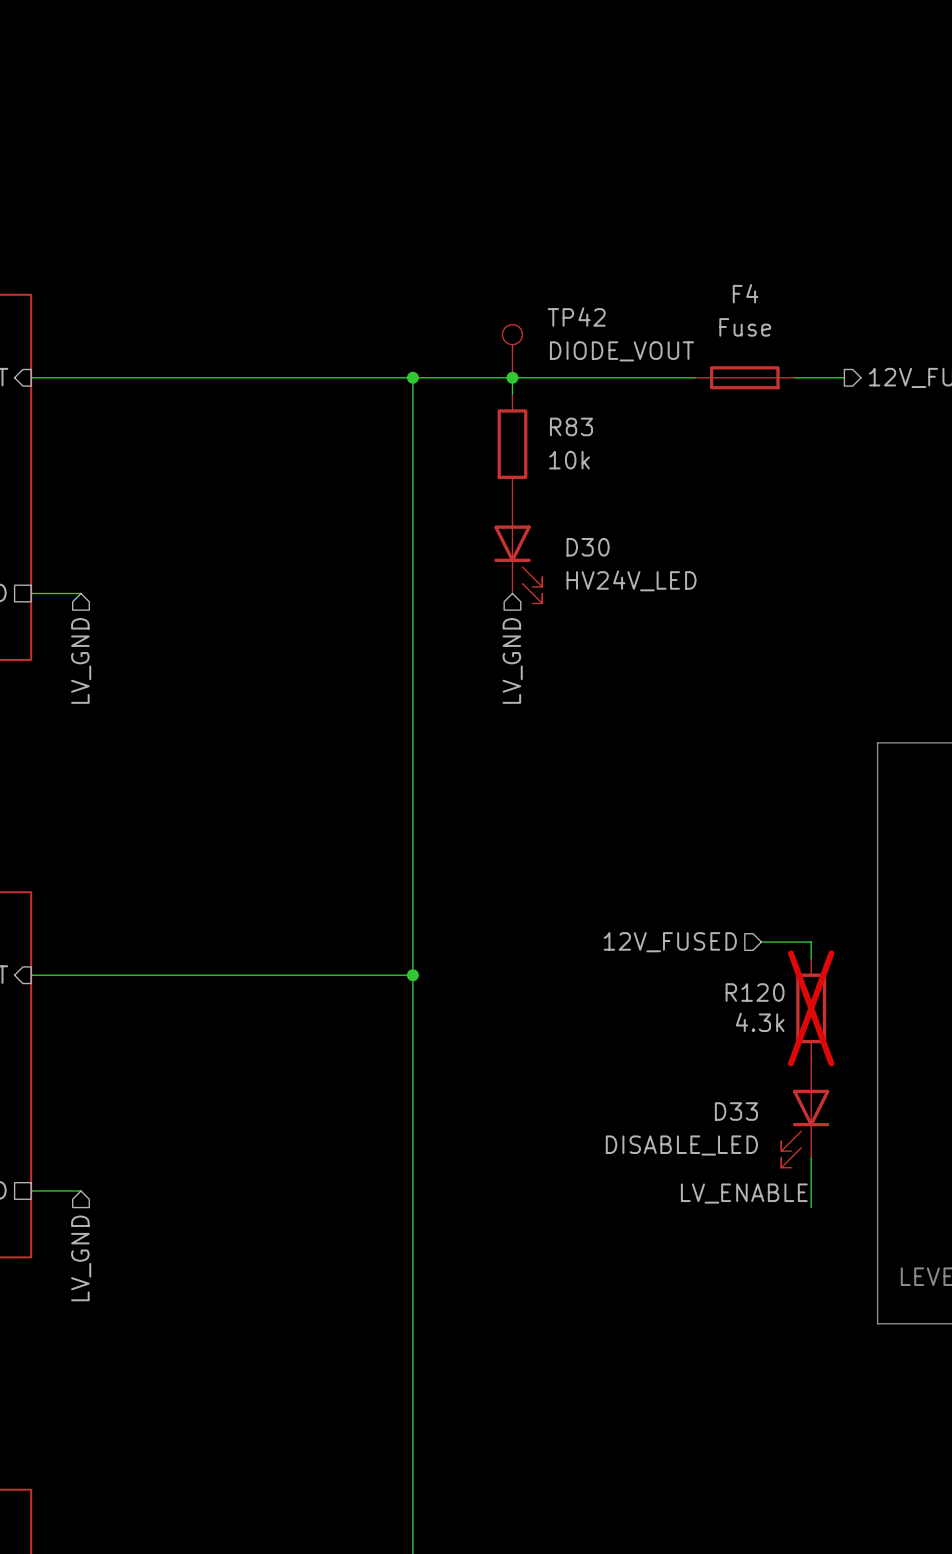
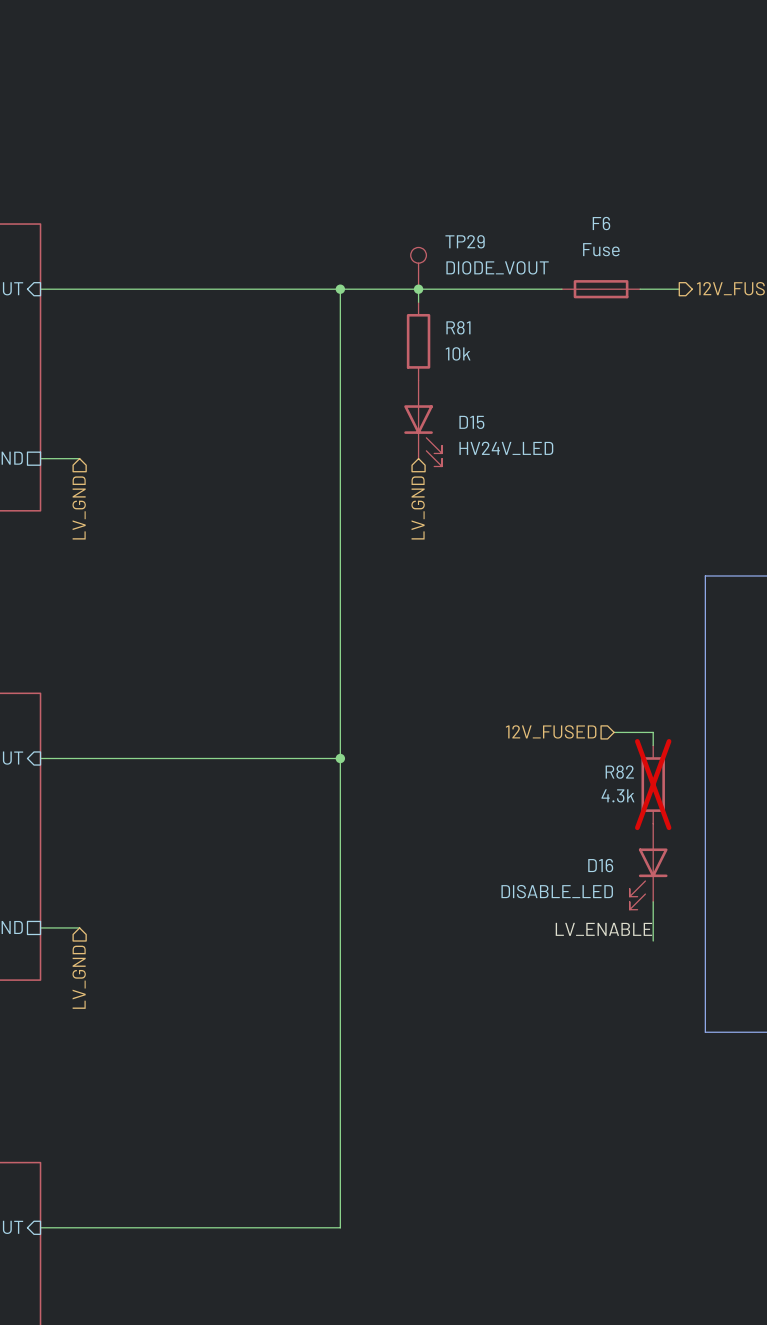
F4 name: F4 (745, 293) -> F6 (601, 223)
TP42 name: TP42 (576, 317) -> TP29 (465, 241)
R83 name: R83 (571, 426) -> R81 (458, 327)
D30 name: D30 (588, 547) -> D15 (471, 422)
R120 name: R120 (755, 992) -> R82 (619, 772)
D33 name: D33 (736, 1111) -> D16 (600, 865)

